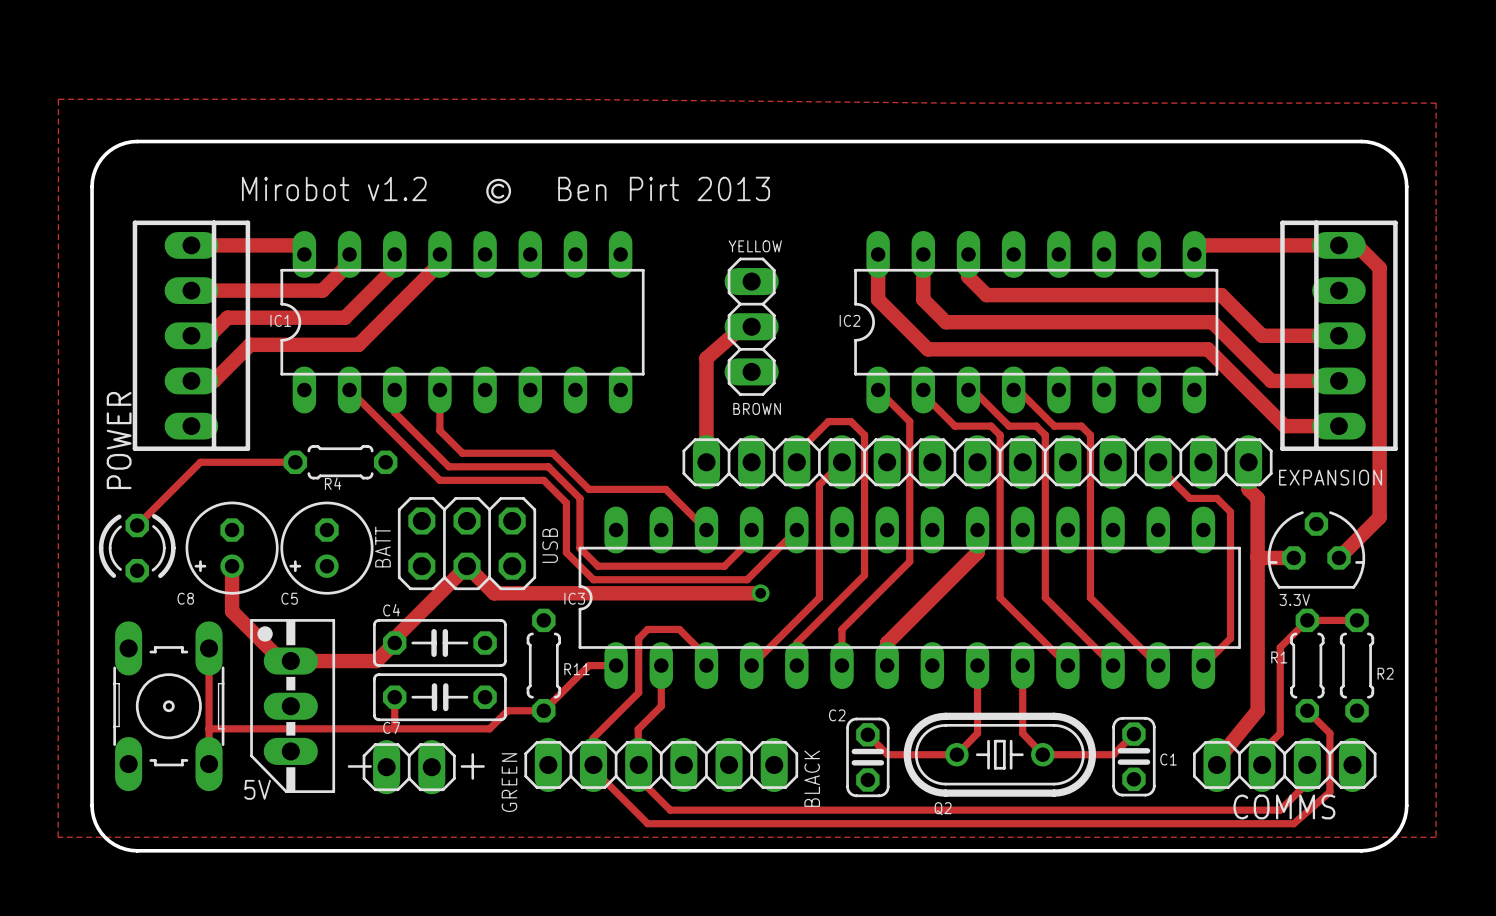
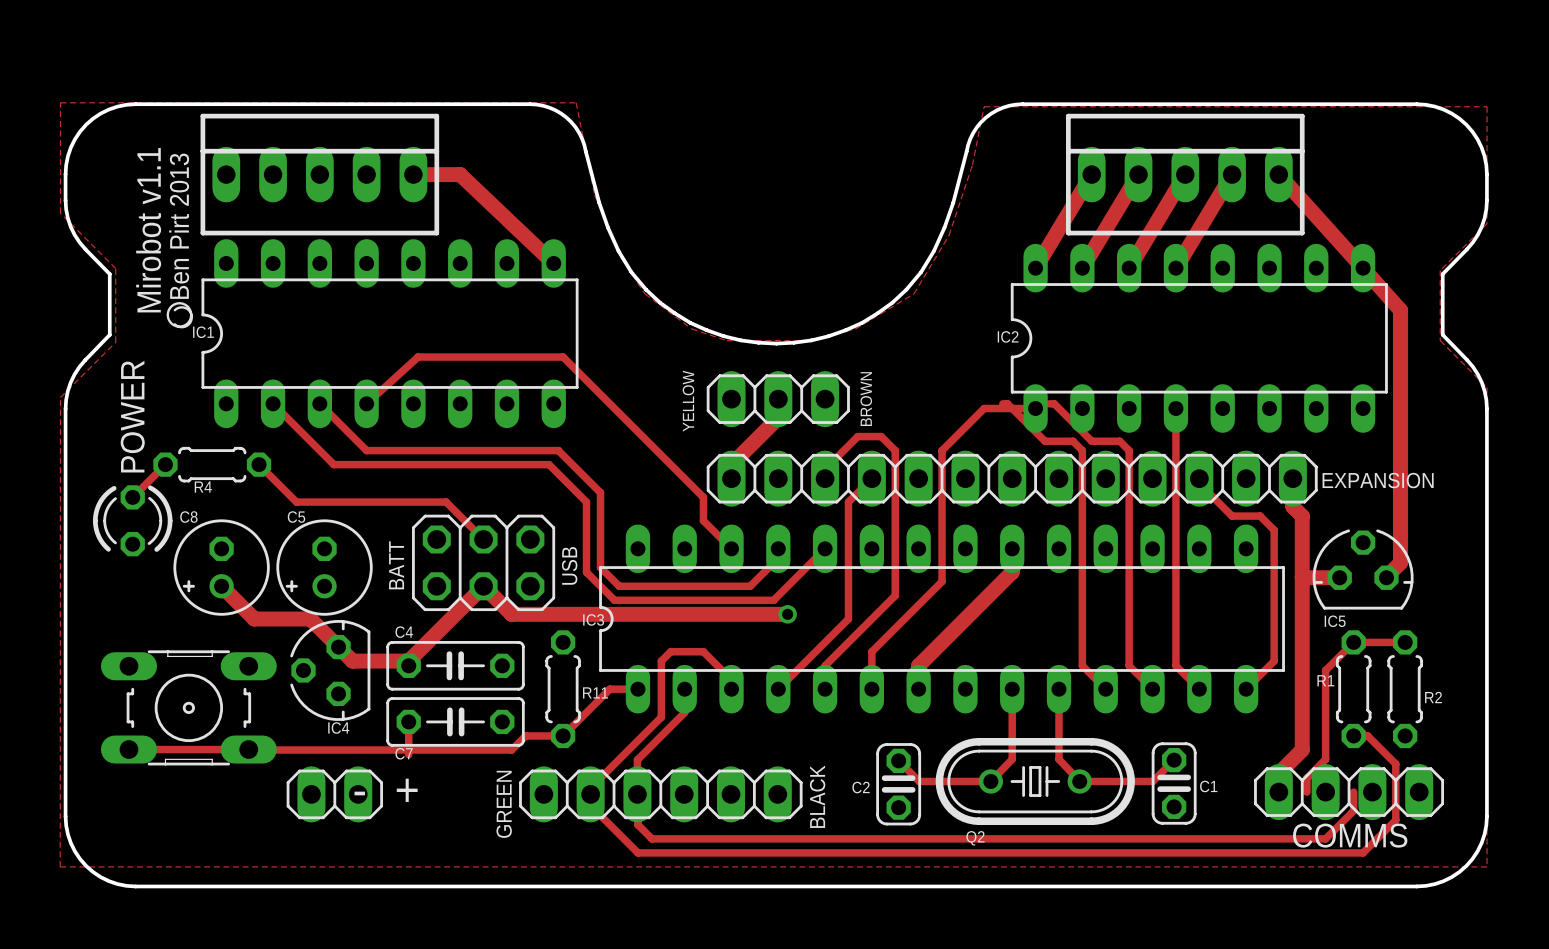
zone outline: (556, 99) (950, 103) -> (576, 102) (594, 194) (621, 258) (644, 293) (691, 328) (726, 340) (808, 340) (855, 328) (913, 293) (949, 235) (972, 165) (984, 106)
board edge: (137, 141) (1361, 141) (1373, 143) (1384, 147) (1393, 154) (1400, 164) (1405, 174) (1406, 186) (1406, 805) (1405, 817) (1400, 828) (1393, 837) (1384, 844) (1373, 849) (1361, 850) (137, 850) (125, 849) (114, 844) (105, 837) (98, 828) (93, 817) (92, 805) (92, 186) (95, 169) (105, 154) (119, 144) (137, 141) -> (135, 104) (108, 109) (86, 124) (70, 147) (65, 174) (66, 209) (70, 226) (79, 242) (109, 274) (109, 334) (85, 360) (74, 374) (67, 391) (65, 408) (66, 825) (74, 851) (86, 865) (100, 877) (117, 884) (135, 886) (1416, 886) (1434, 884) (1451, 877) (1466, 865) (1477, 851) (1484, 834) (1486, 816) (1486, 408) (1484, 391) (1477, 374) (1467, 360) (1442, 334) (1442, 274) (1472, 242) (1481, 226) (1486, 209) (1486, 174) (1484, 156) (1477, 139) (1466, 124) (1451, 113) (1434, 106) (1416, 104) (1022, 104) (1003, 107) (985, 117) (973, 132) (944, 227) (933, 251) (921, 272) (906, 289) (877, 313) (845, 330) (811, 340) (776, 343) (741, 340) (706, 330) (674, 313) (646, 289) (631, 272) (618, 251) (607, 227) (579, 132) (566, 117) (549, 107) (529, 104) (135, 104)
track: none -> (413, 174) (460, 174) (553, 263)
track: none -> (1091, 174) (1035, 268)
track: none -> (1138, 174) (1082, 268)
track: none -> (1185, 174) (1129, 268)
track: none -> (1232, 174) (1175, 268)
line: (503, 186) (496, 185) (492, 191) (496, 197) (503, 195) -> none
text: Mirobot v1.2 (334, 188) -> none
text: Ben Pirt 2013 (664, 188) -> none
drawing position: (498, 191) -> (179, 314)
text: none -> Ben Pirt 2013 (179, 226)
zone outline: (58, 206) (58, 383) -> (60, 213) (115, 268) (115, 342) (60, 397)
text: none -> Mirobot v1.1 (148, 230)
zone outline: (1436, 216) (1436, 374) -> (1487, 223) (1440, 270) (1440, 340) (1487, 387)
track: (191, 245) (295, 245) (304, 254) -> none
text rotation: 0° (755, 246) -> 90° counterclockwise (688, 401)
text position: YELLOW (755, 246) -> YELLOW (688, 401)
track: (349, 254) (349, 263) (322, 290) (191, 290) -> none
track: (394, 254) (394, 268) (345, 317) (227, 317) (209, 335) (191, 335) -> none
track: (439, 254) (439, 263) (358, 344) (250, 344) (214, 380) (191, 380) -> none
track: (878, 254) (878, 299) (927, 349) (1207, 349) (1284, 426) (1338, 426) -> none
track: (923, 254) (923, 299) (945, 322) (1212, 322) (1271, 380) (1338, 380) -> none
track: (968, 254) (968, 277) (986, 295) (1221, 295) (1262, 335) (1338, 335) -> none
track: (1194, 254) (1203, 245) (1357, 245) (1379, 268) (1379, 517) (1339, 557) -> (1278, 174) (1400, 310) (1400, 562) (1386, 577)
line: none -> (174, 310) (179, 307) (185, 308) (189, 311) (191, 317) (189, 323) (185, 326) (179, 326) (174, 324)
IC1 position: (462, 322) -> (390, 333)
IC2 position: (1036, 322) -> (1199, 338)
track: (751, 326) (742, 326) (706, 358) (706, 448) -> (778, 399) (778, 417) (731, 464)
part rotation: 0° (751, 326) -> 90° clockwise (778, 399)
part rotation: 0° (191, 335) -> 90° counterclockwise (319, 174)
part position: (191, 335) -> (319, 174)
part rotation: 0° (1338, 335) -> 90° clockwise (1185, 174)
part position: (1338, 335) -> (1185, 174)
track: none -> (319, 403) (366, 450) (558, 450) (600, 492) (600, 516)
track: (349, 389) (439, 480) (543, 480) (566, 502) -> none
track: (394, 389) (394, 412) (448, 466) (548, 466) -> (273, 403) (333, 464) (549, 464) (567, 483)
track: (439, 389) (439, 430) (462, 453) (552, 453) (589, 489) (665, 489) (679, 502) -> (366, 403) (418, 357) (563, 357) (703, 497) (703, 520)
track: (878, 389) (909, 421) (909, 435) -> (1035, 408) (984, 408) (942, 450)
track: (923, 389) (923, 394) (954, 426) (991, 426) (1000, 435) (1000, 597) (1045, 642) -> none
track: none -> (1175, 408) (1175, 665)
text rotation: 0° (757, 408) -> 90° counterclockwise (866, 399)
text position: BROWN (757, 408) -> BROWN (866, 399)
POWER name position: POWER (119, 440) -> POWER (132, 416)
track: none -> (165, 464) (132, 497)
track: none -> (259, 464) (296, 502) (446, 502) (483, 539)
track: (295, 462) (200, 462) (137, 525) -> none
R4 position: (340, 462) -> (212, 464)
EXPANSION name position: EXPANSION (1330, 477) -> EXPANSION (1378, 480)
track: (566, 484) (579, 498) -> (586, 502) (586, 520)
POWER position: (137, 548) -> (132, 520)
C8 position: (232, 548) -> (221, 567)
C5 position: (326, 548) -> (324, 567)
track: none -> (221, 586) (254, 619) (310, 619) (352, 661) (408, 661)
track: (232, 566) (232, 611) (281, 661) (376, 661) (394, 642) -> none
track: (1045, 597) (1090, 642) -> (1082, 619) (1082, 665)
track: (1090, 597) (1135, 642) -> (1129, 619) (1129, 665)
C8 name position: C8 (185, 598) -> C8 (188, 517)
C5 name position: C5 (289, 598) -> C5 (296, 517)
3.3V name: 3.3V (1294, 599) -> IC5 (1335, 621)
IC4: none -> (330, 670)
track: (209, 648) (209, 764) -> none
track: (661, 688) (661, 706) (638, 729) (638, 778) (670, 810) -> (684, 712) (637, 759) (637, 824) (651, 838) (694, 838)
part rotation: 0° (168, 706) -> 90° clockwise (188, 707)
5V: (292, 706) -> none
track: (1257, 710) (1216, 760) (1216, 764) -> (1302, 735) (1302, 750) (1278, 773) (1278, 792)
track: (1307, 710) (1329, 733) (1329, 792) (1293, 823) -> (1353, 735) (1367, 735) (1395, 764) (1395, 820) (1363, 852) (1339, 852)
C2 name position: C2 (837, 715) -> C2 (861, 787)
track: (494, 724) (489, 728) (209, 728) -> (511, 750) (128, 749)
track: (593, 738) (593, 769) (647, 823) -> (614, 764) (590, 787) (591, 806) (637, 852) (670, 852)
part position: (661, 764) -> (660, 794)
COMMS position: (1284, 764) -> (1349, 792)
text position: + (472, 766) -> + (407, 790)
part position: (409, 767) -> (334, 794)
text position: BLACK (812, 778) -> BLACK (817, 796)
text position: GREEN (509, 782) -> GREEN (504, 804)

